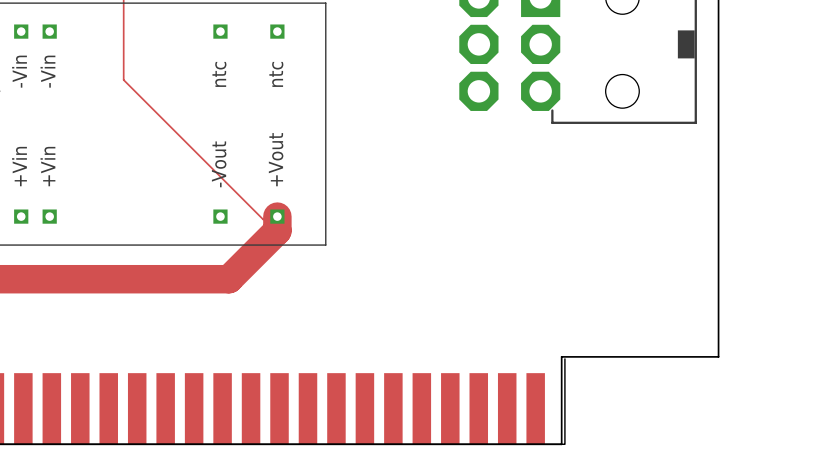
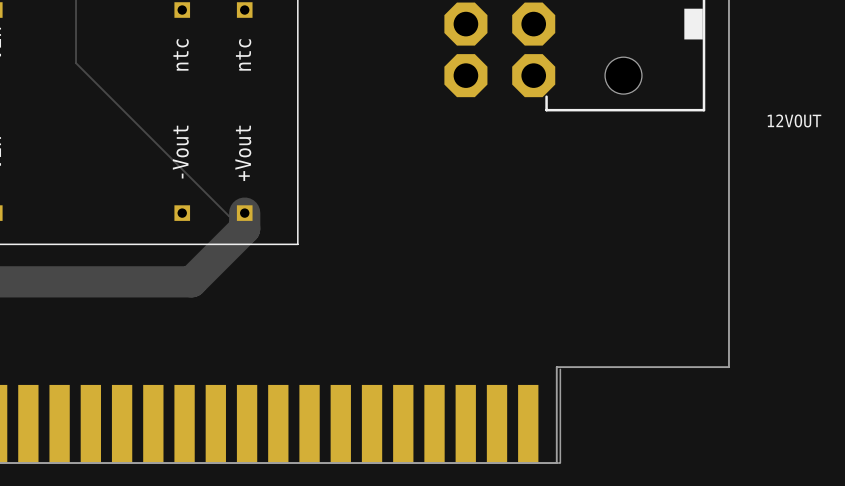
12VOUT name: none -> 12VOUT (794, 120)

